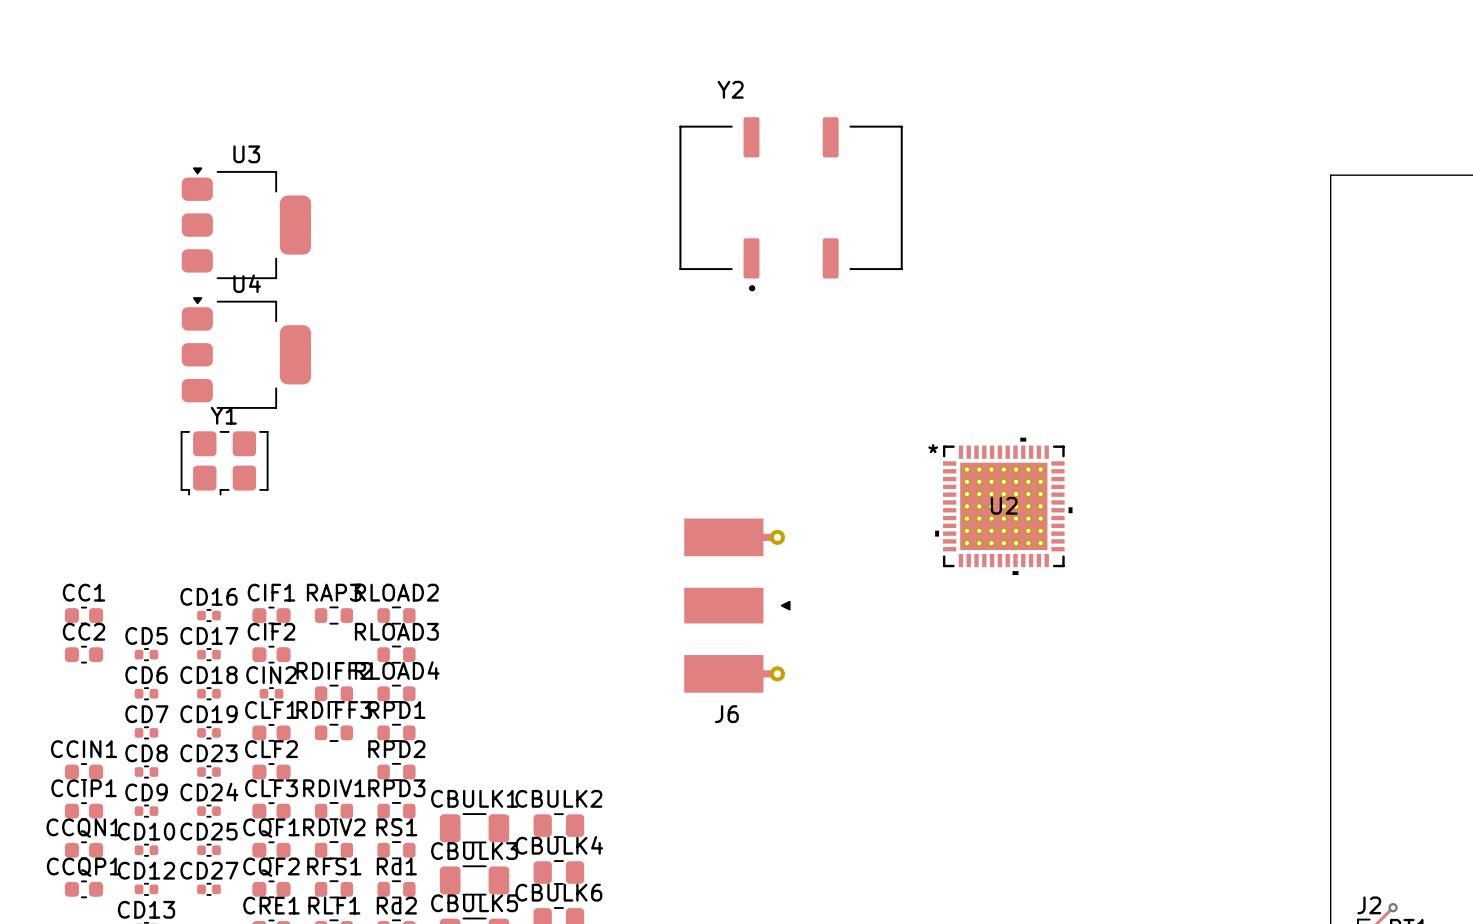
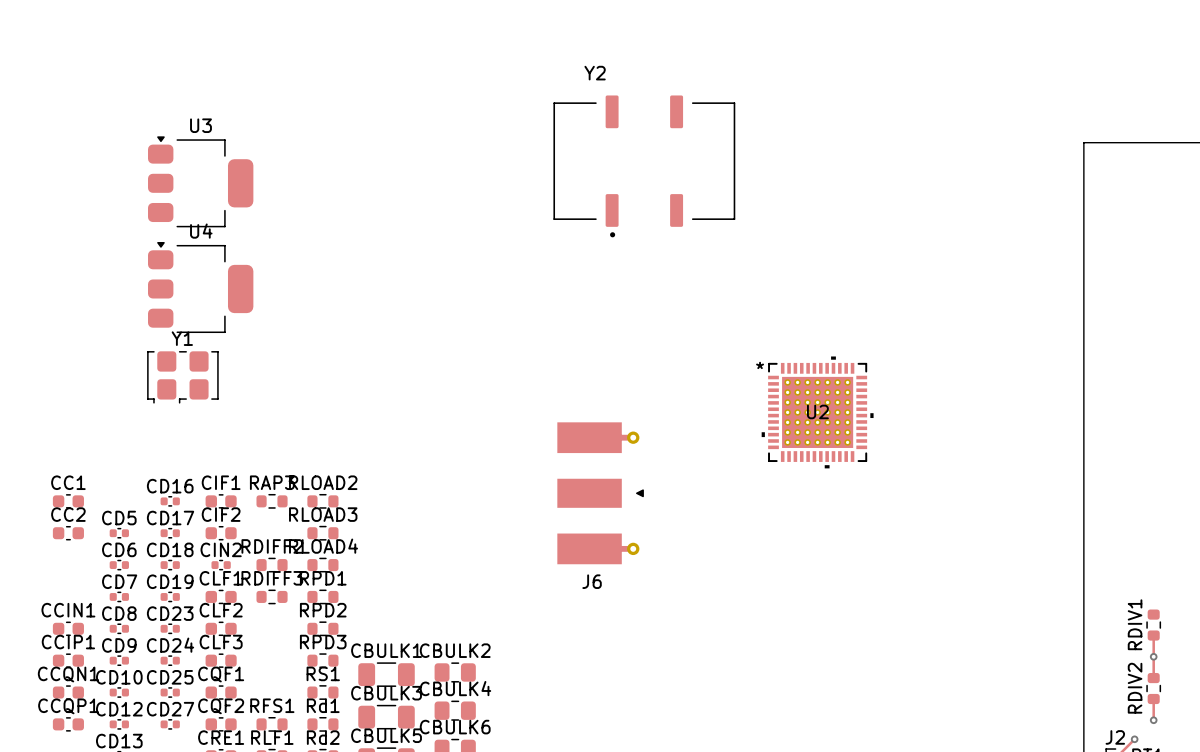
track: none -> (1153, 635) (1153, 678)
RDIV1 name position: RDIV1 (334, 788) -> RDIV1 (1135, 624)
via: none -> (1153, 656)
RDIV1 rotation: 0° (333, 811) -> 90° clockwise (1153, 625)
RDIV1 position: (333, 811) -> (1153, 625)
RDIV2 name position: RDIV2 (334, 827) -> RDIV2 (1135, 688)
RDIV2 rotation: 0° (333, 850) -> 90° clockwise (1153, 688)
RDIV2 position: (333, 850) -> (1153, 688)
track: none -> (1153, 699) (1153, 720)
via: none -> (1153, 720)

